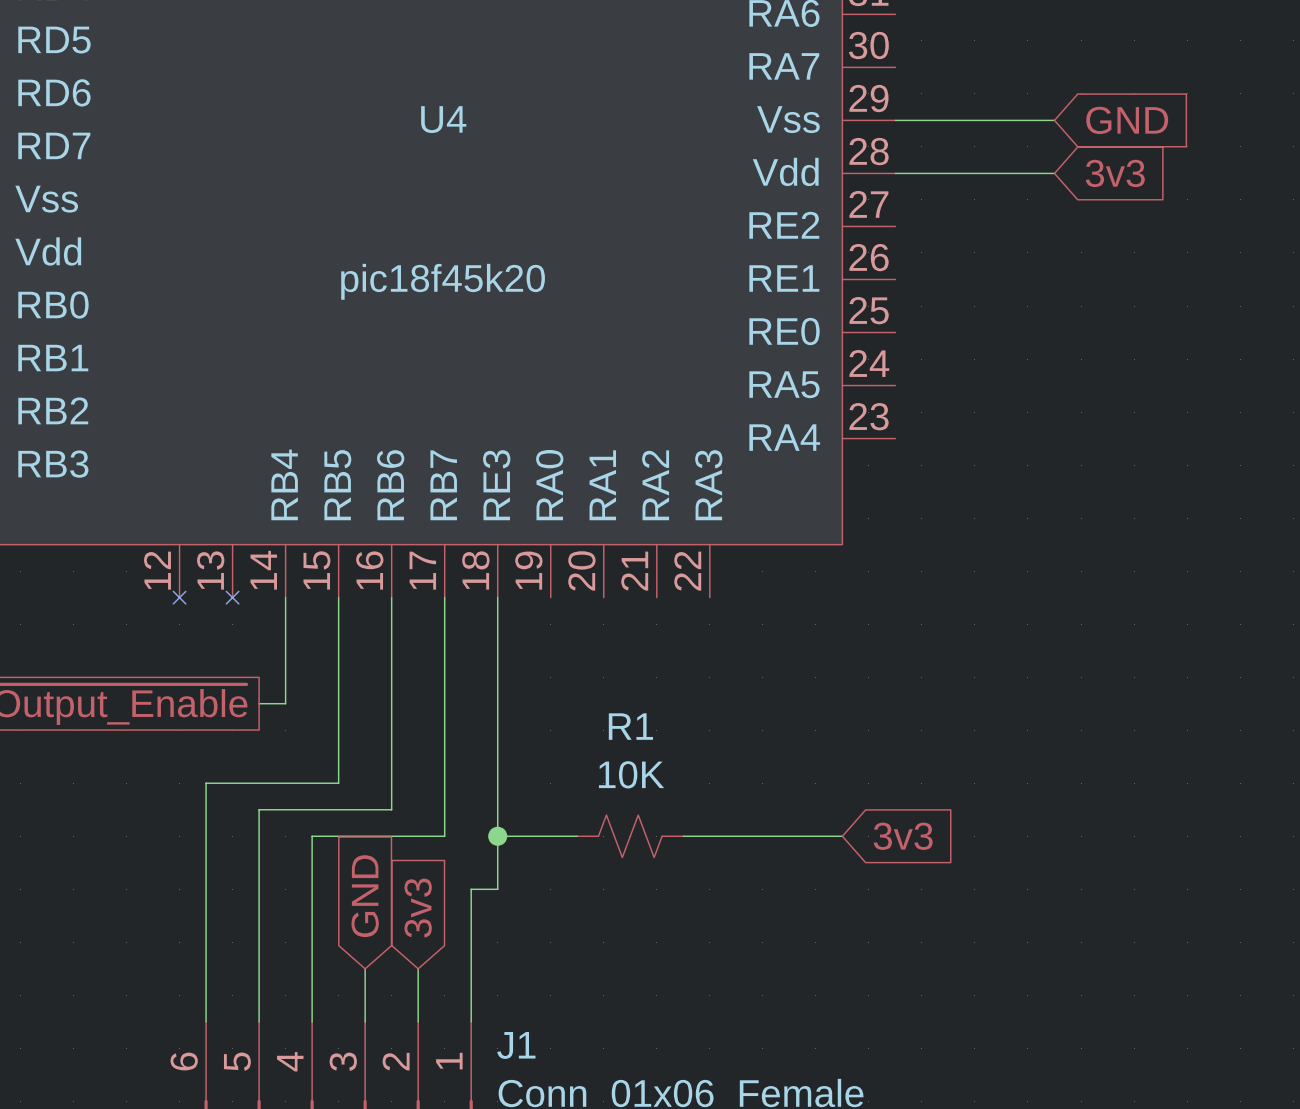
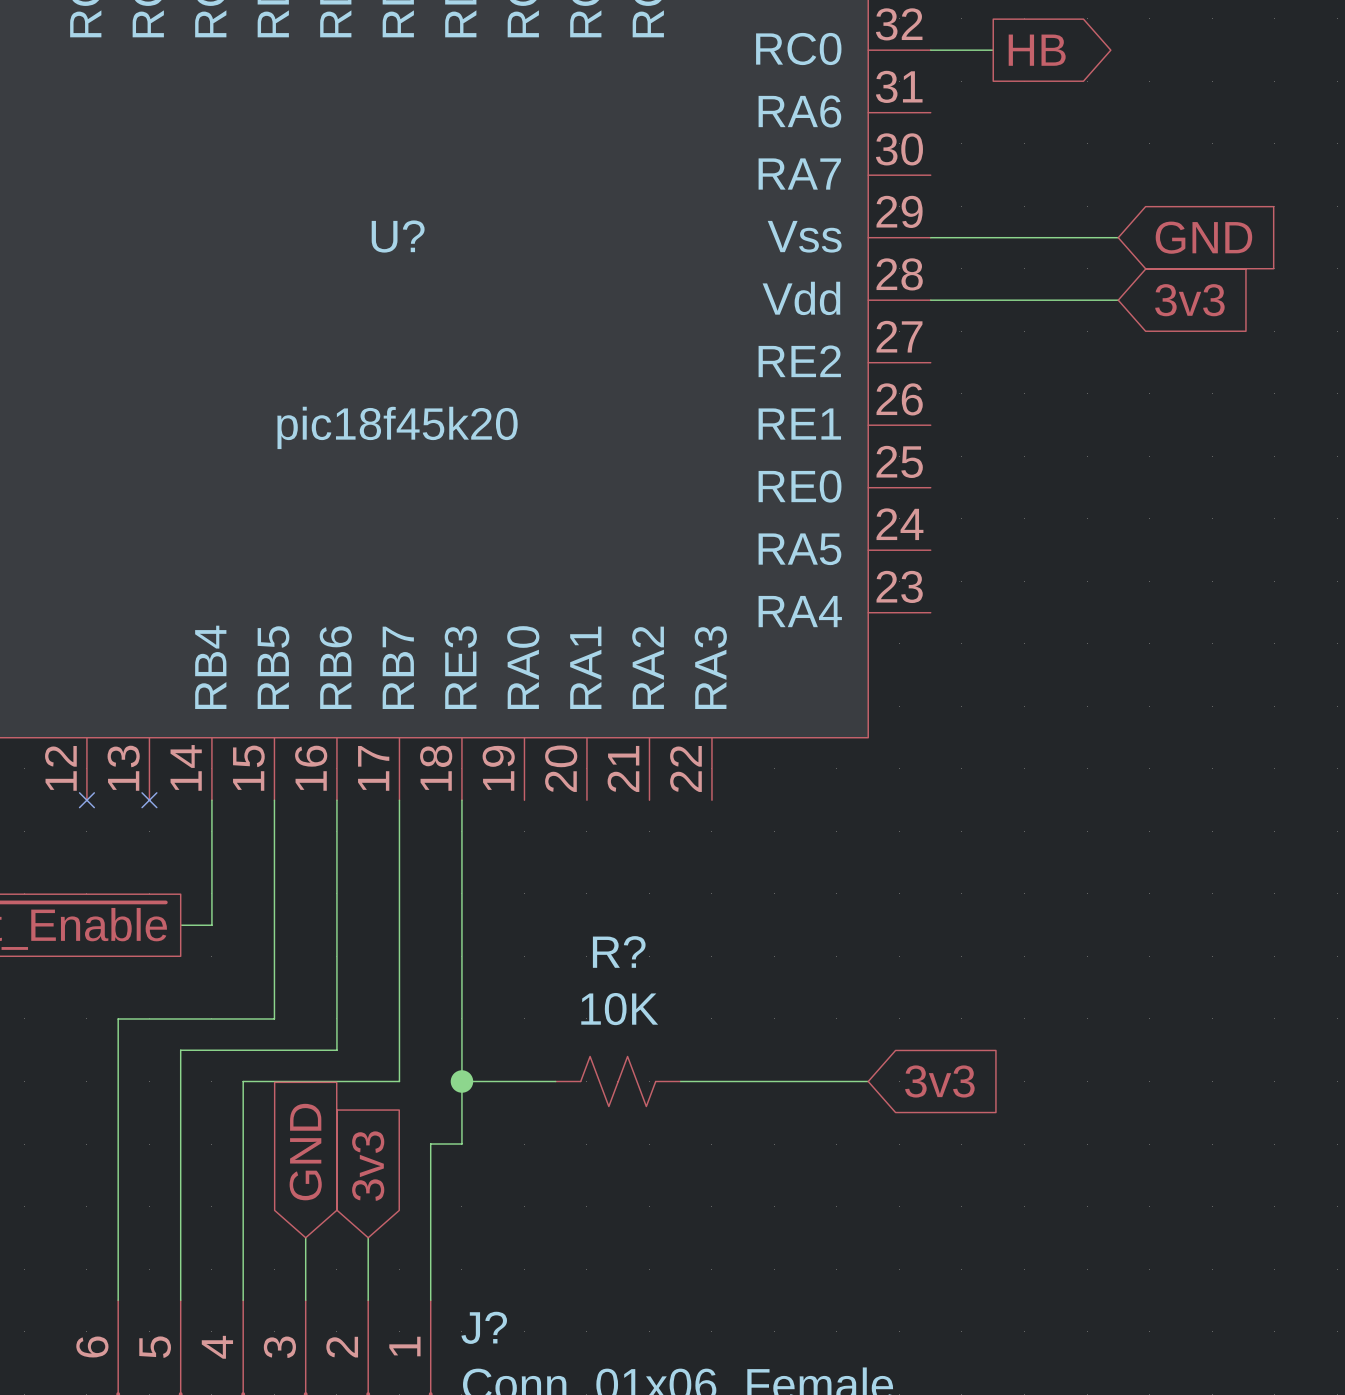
U4 name: U4 (443, 119) -> U? (398, 236)
R1 name: R1 (630, 726) -> R? (619, 951)
J1 name: J1 (516, 1045) -> J? (484, 1327)

